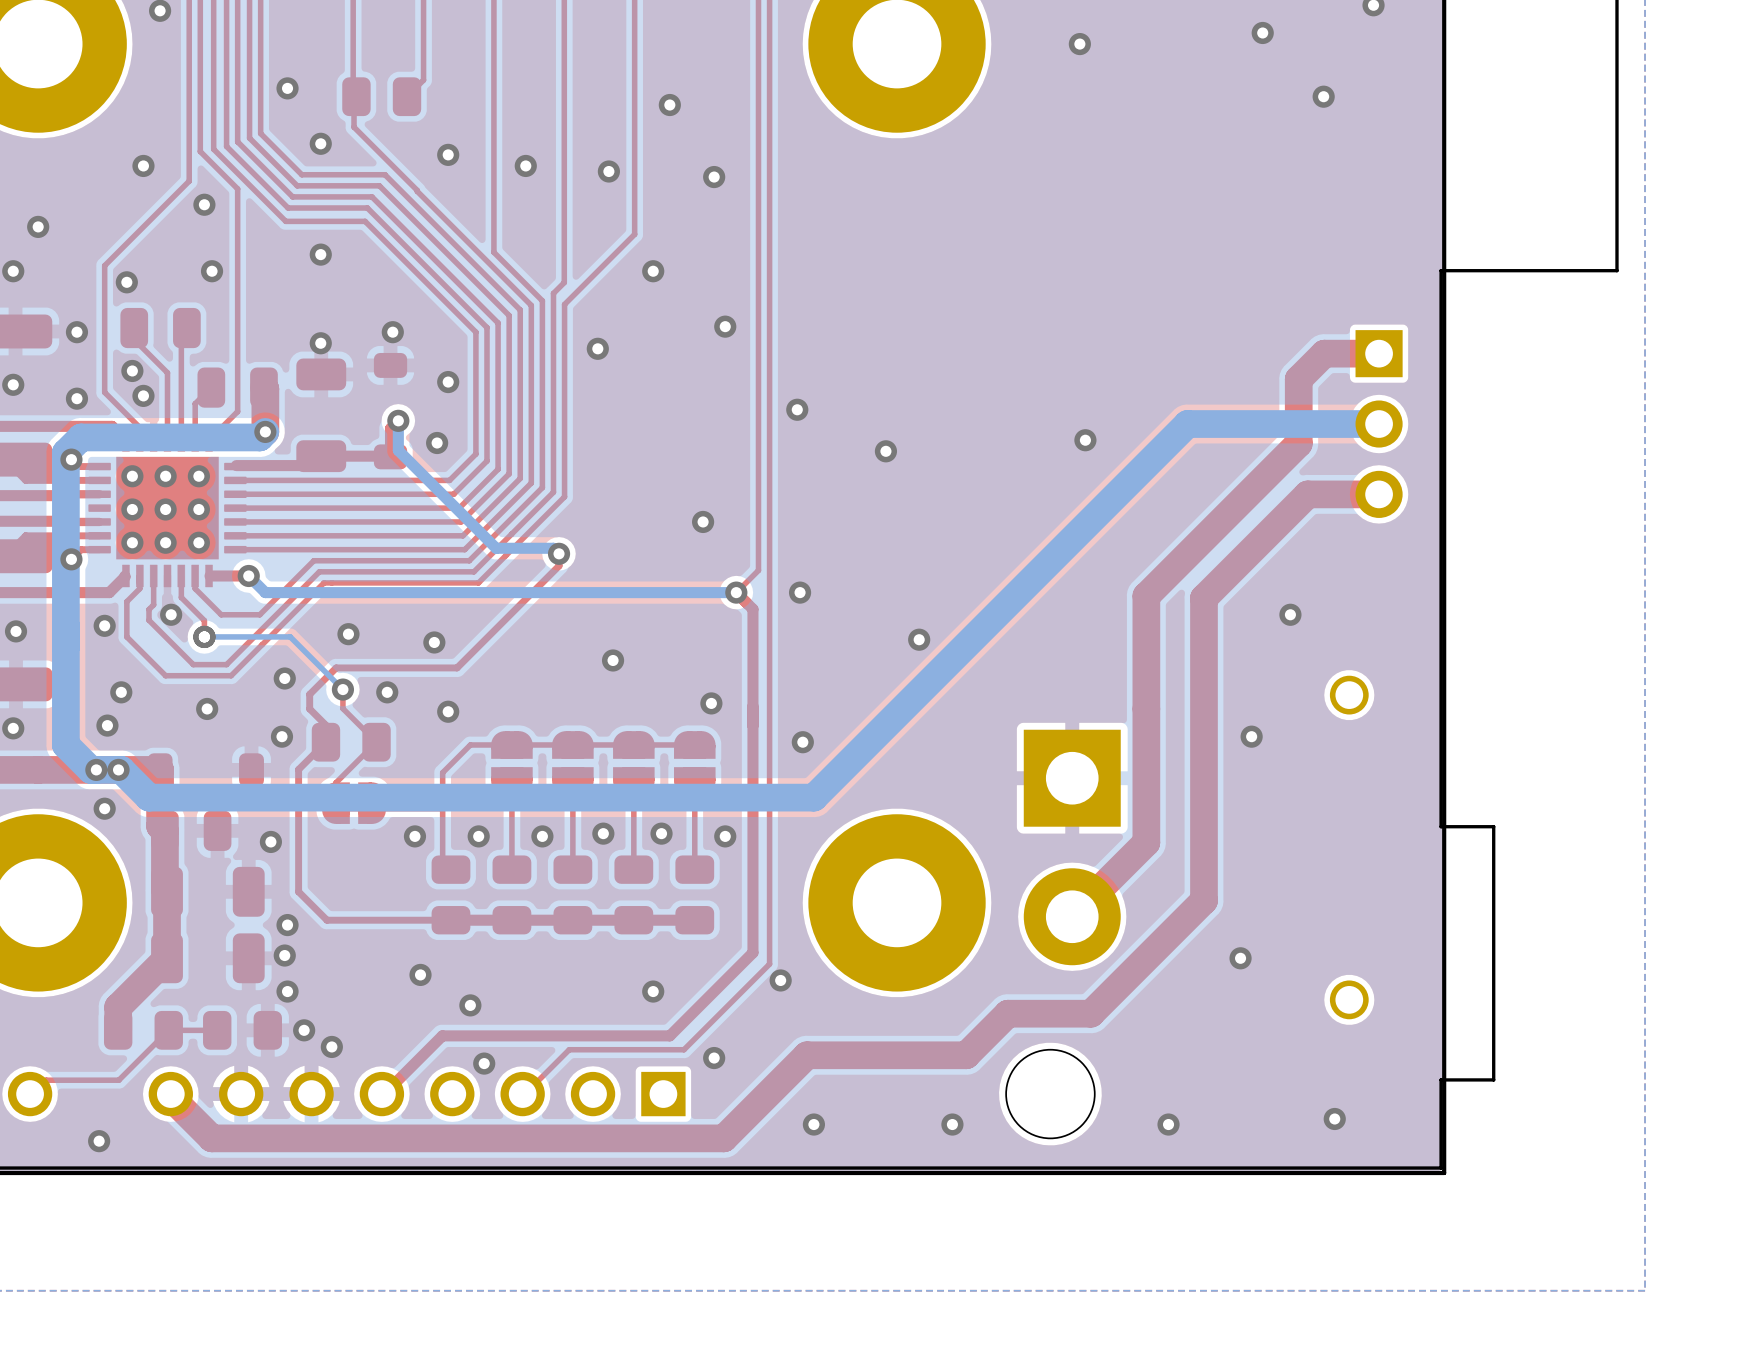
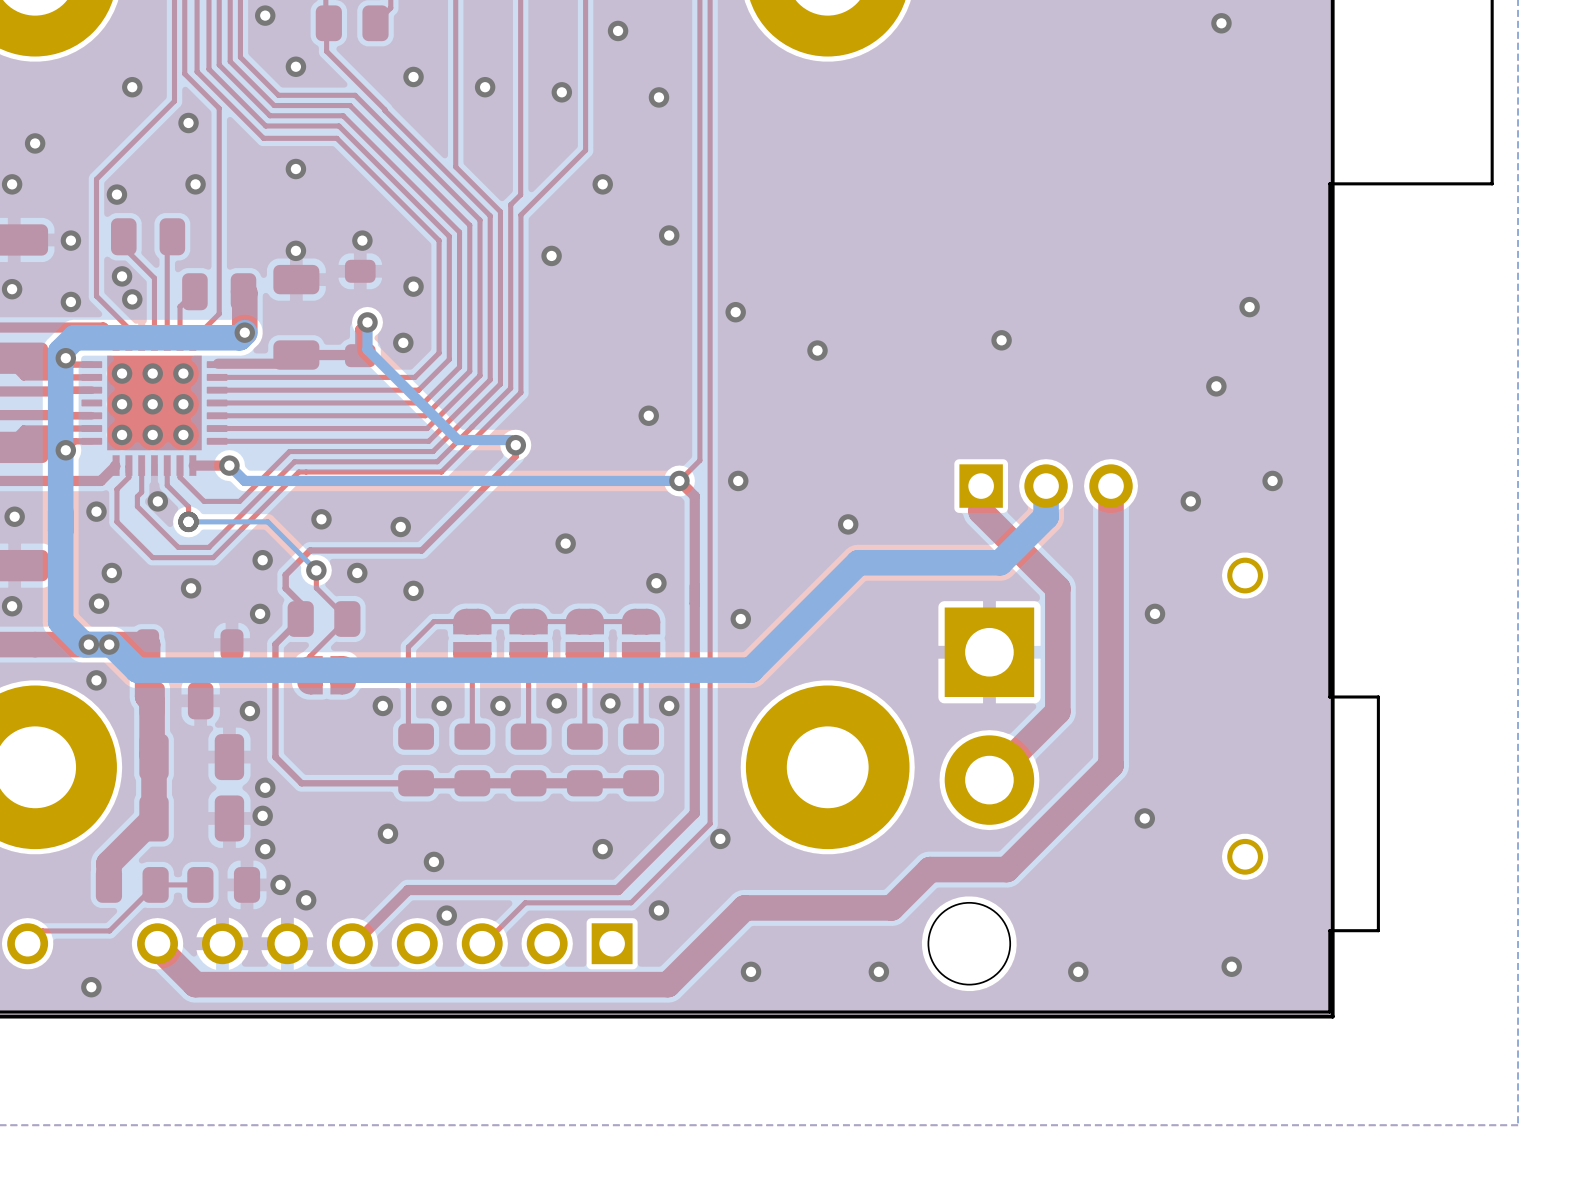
top track: (1379, 353) (1324, 353) (1298, 379) (1298, 443) (1146, 596) (1146, 708) -> (981, 486) (981, 511) (1057, 588)
via: none -> (1249, 307)
bottom track: (1379, 424) (1187, 424) (930, 681) -> (1046, 486) (1046, 516) (1000, 562) (858, 562)
part rotation: 0° (1379, 424) -> 90° counterclockwise (1046, 486)
part position: (1379, 424) -> (1046, 486)
via: none -> (1216, 386)
top track: (1379, 494) (1307, 494) (1203, 598) -> none
via: none -> (1272, 480)

